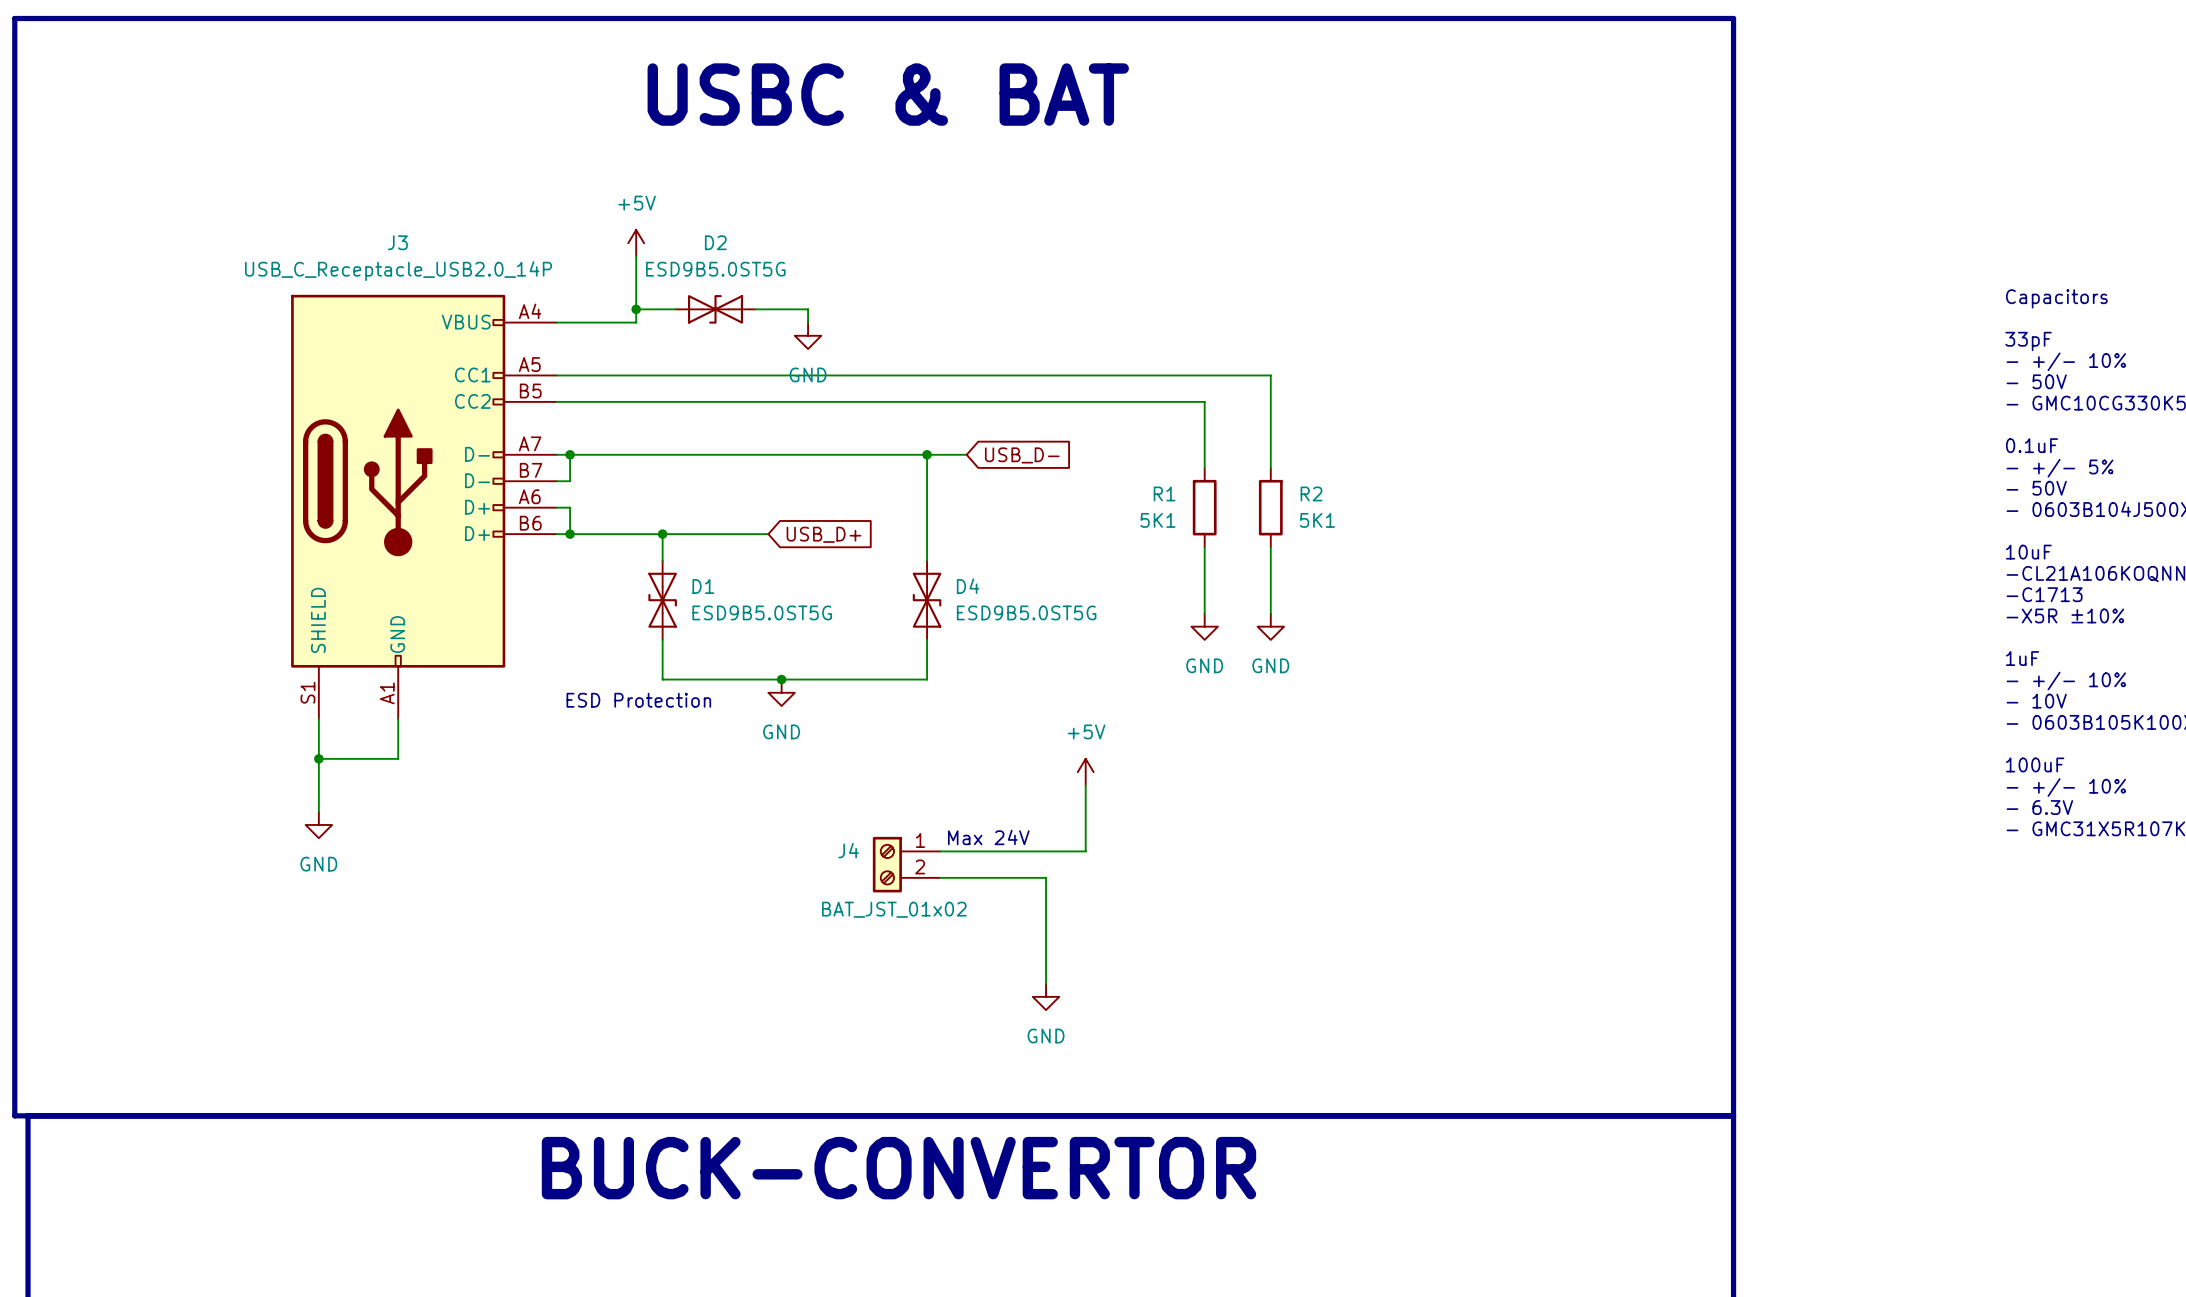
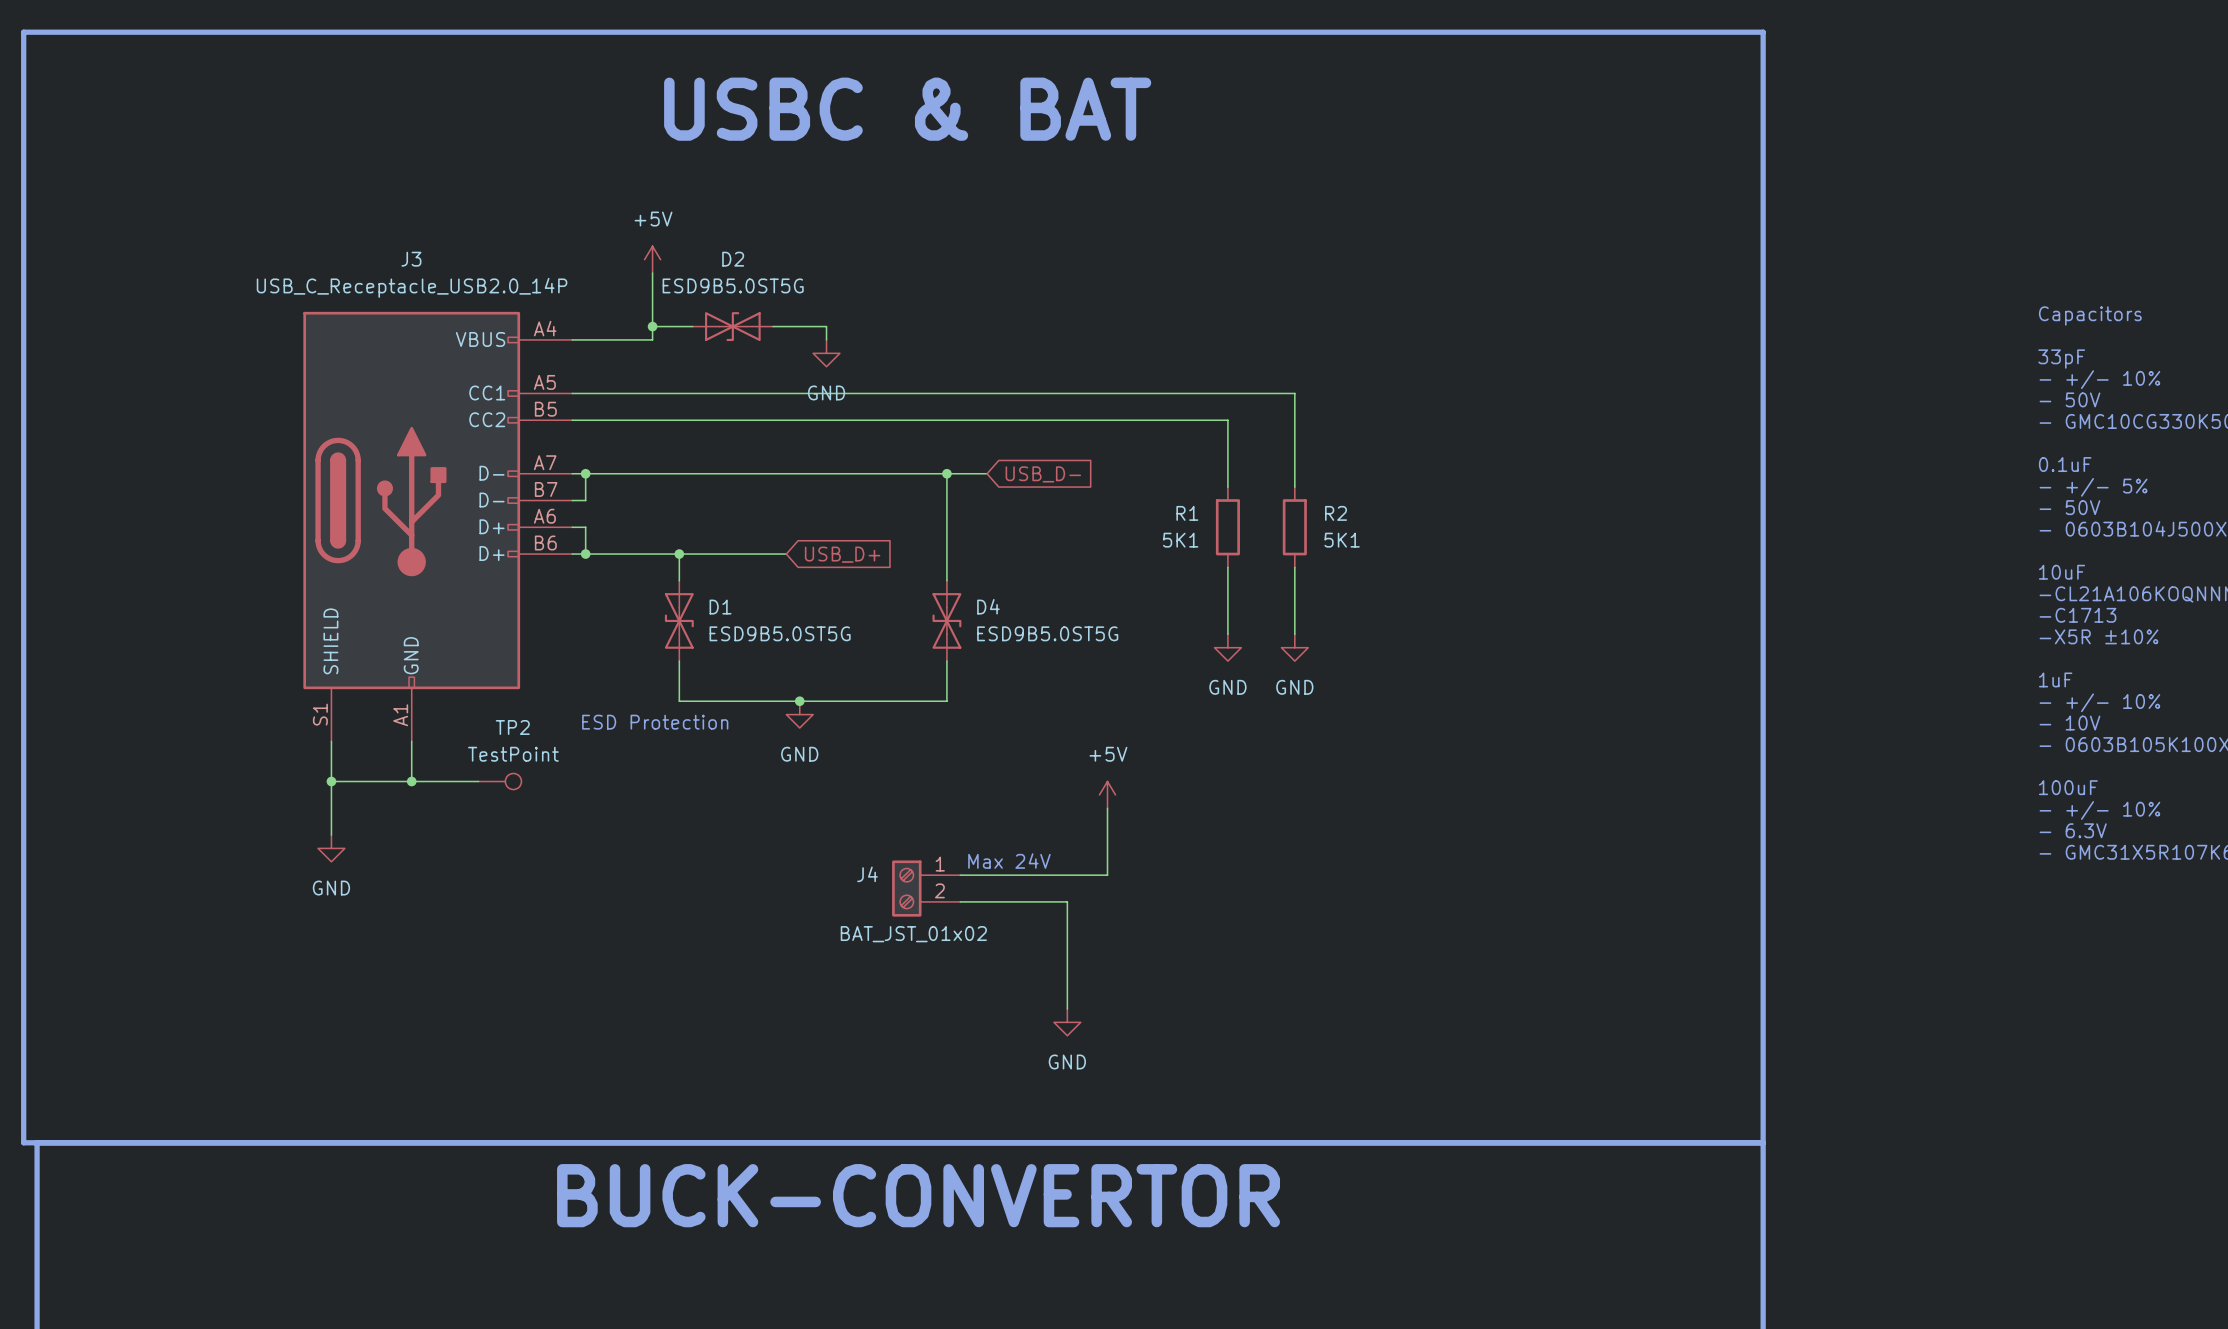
wire: none -> (411, 781) (478, 781)
junction: none -> (411, 781)
TP2: none -> TestPoint (500, 781)

